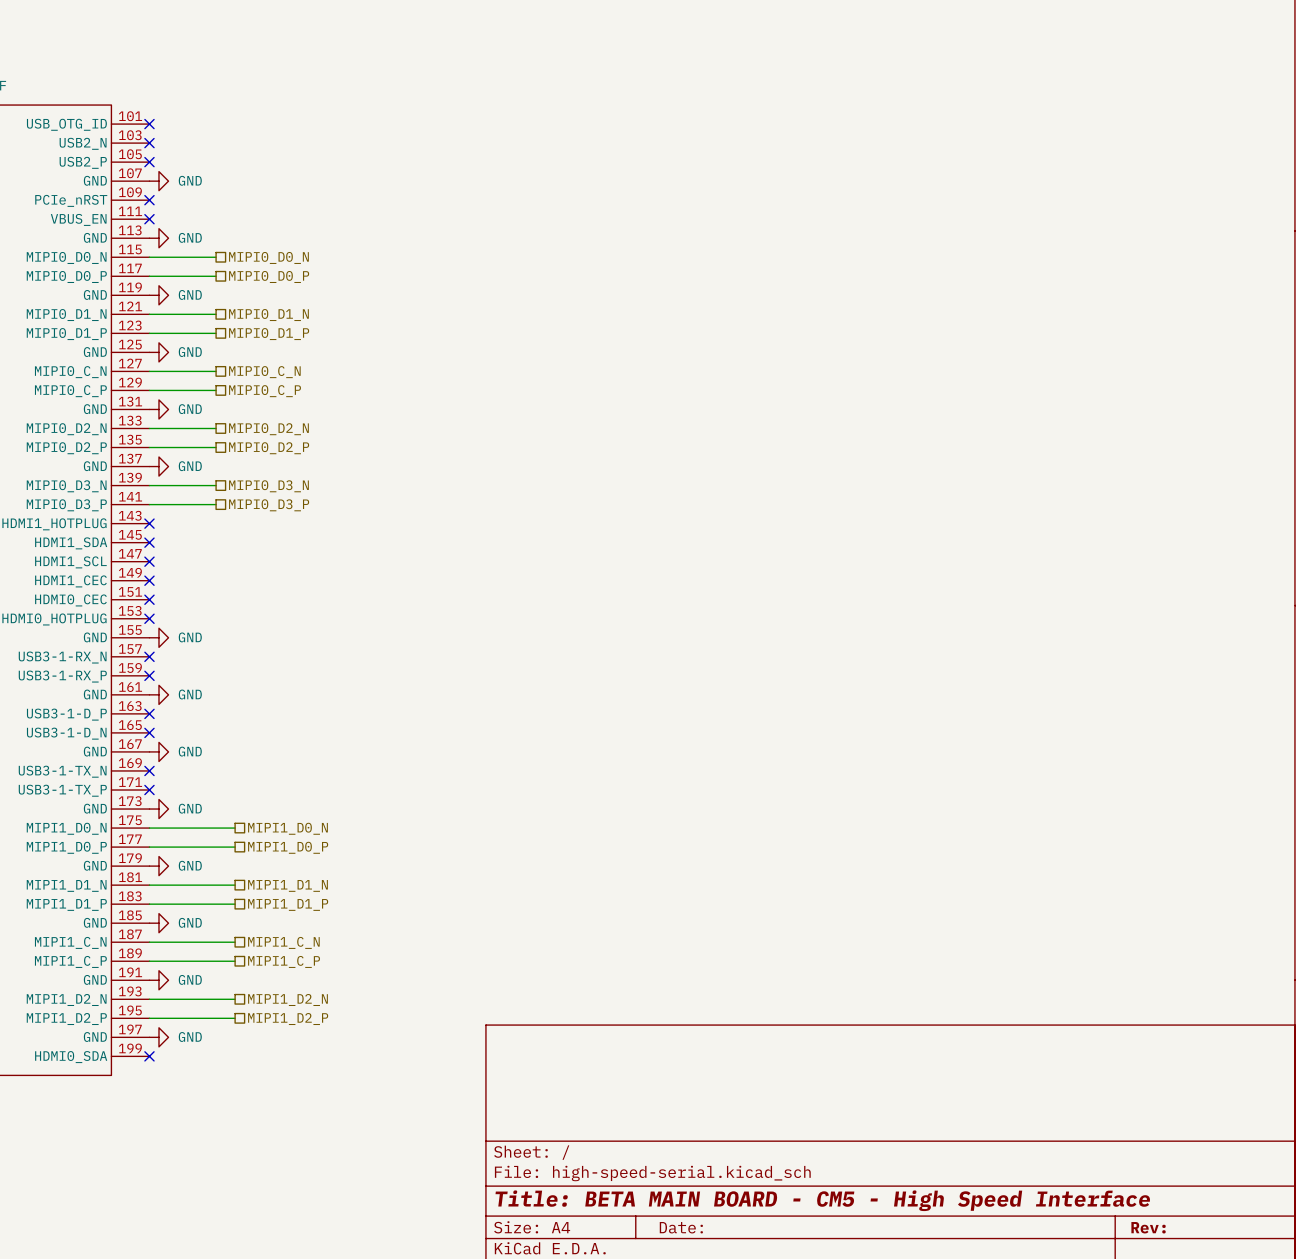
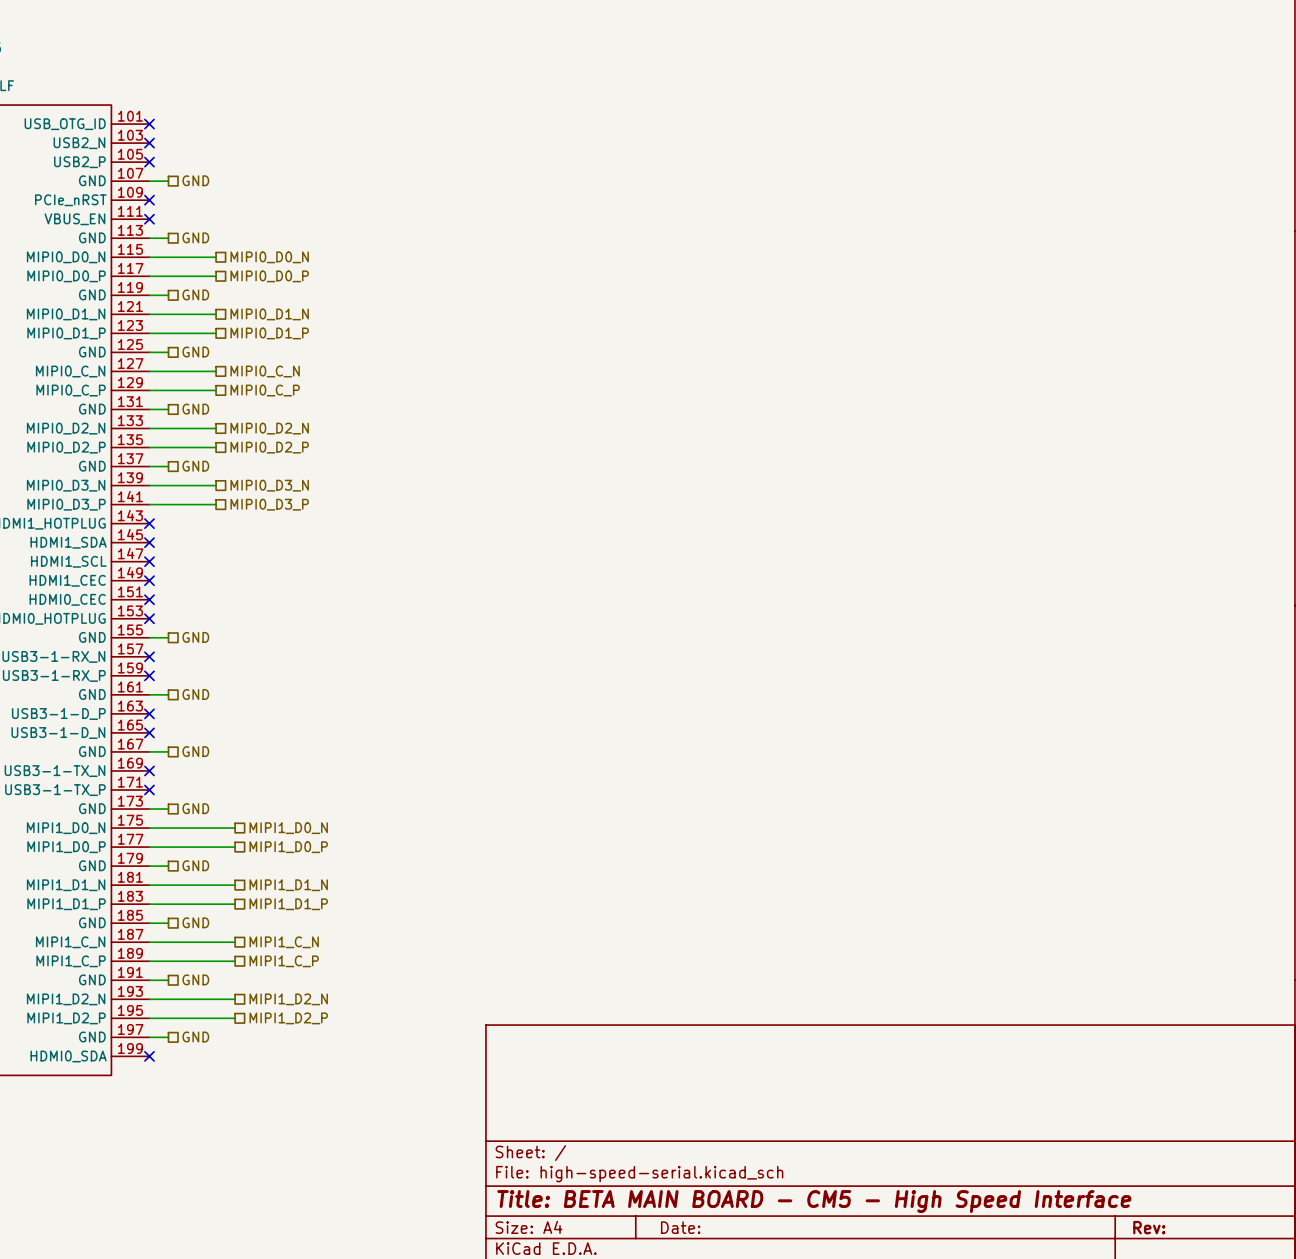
hierarchical label: none -> GND (195, 180)
power symbol: GND (158, 181) -> none
hierarchical label: none -> GND (195, 237)
power symbol: GND (158, 238) -> none
hierarchical label: none -> GND (195, 294)
power symbol: GND (158, 295) -> none
power symbol: GND (158, 352) -> none
hierarchical label: none -> GND (195, 352)
power symbol: GND (158, 409) -> none
hierarchical label: none -> GND (195, 409)
power symbol: GND (158, 466) -> none
hierarchical label: none -> GND (195, 466)
power symbol: GND (158, 637) -> none
hierarchical label: none -> GND (195, 637)
power symbol: GND (158, 694) -> none
hierarchical label: none -> GND (195, 694)
power symbol: GND (158, 751) -> none
hierarchical label: none -> GND (195, 751)
hierarchical label: none -> GND (195, 808)
power symbol: GND (158, 809) -> none
hierarchical label: none -> GND (195, 865)
power symbol: GND (158, 866) -> none
hierarchical label: none -> GND (195, 922)
power symbol: GND (158, 923) -> none
hierarchical label: none -> GND (195, 979)
power symbol: GND (158, 980) -> none
hierarchical label: none -> GND (195, 1036)
power symbol: GND (158, 1037) -> none

